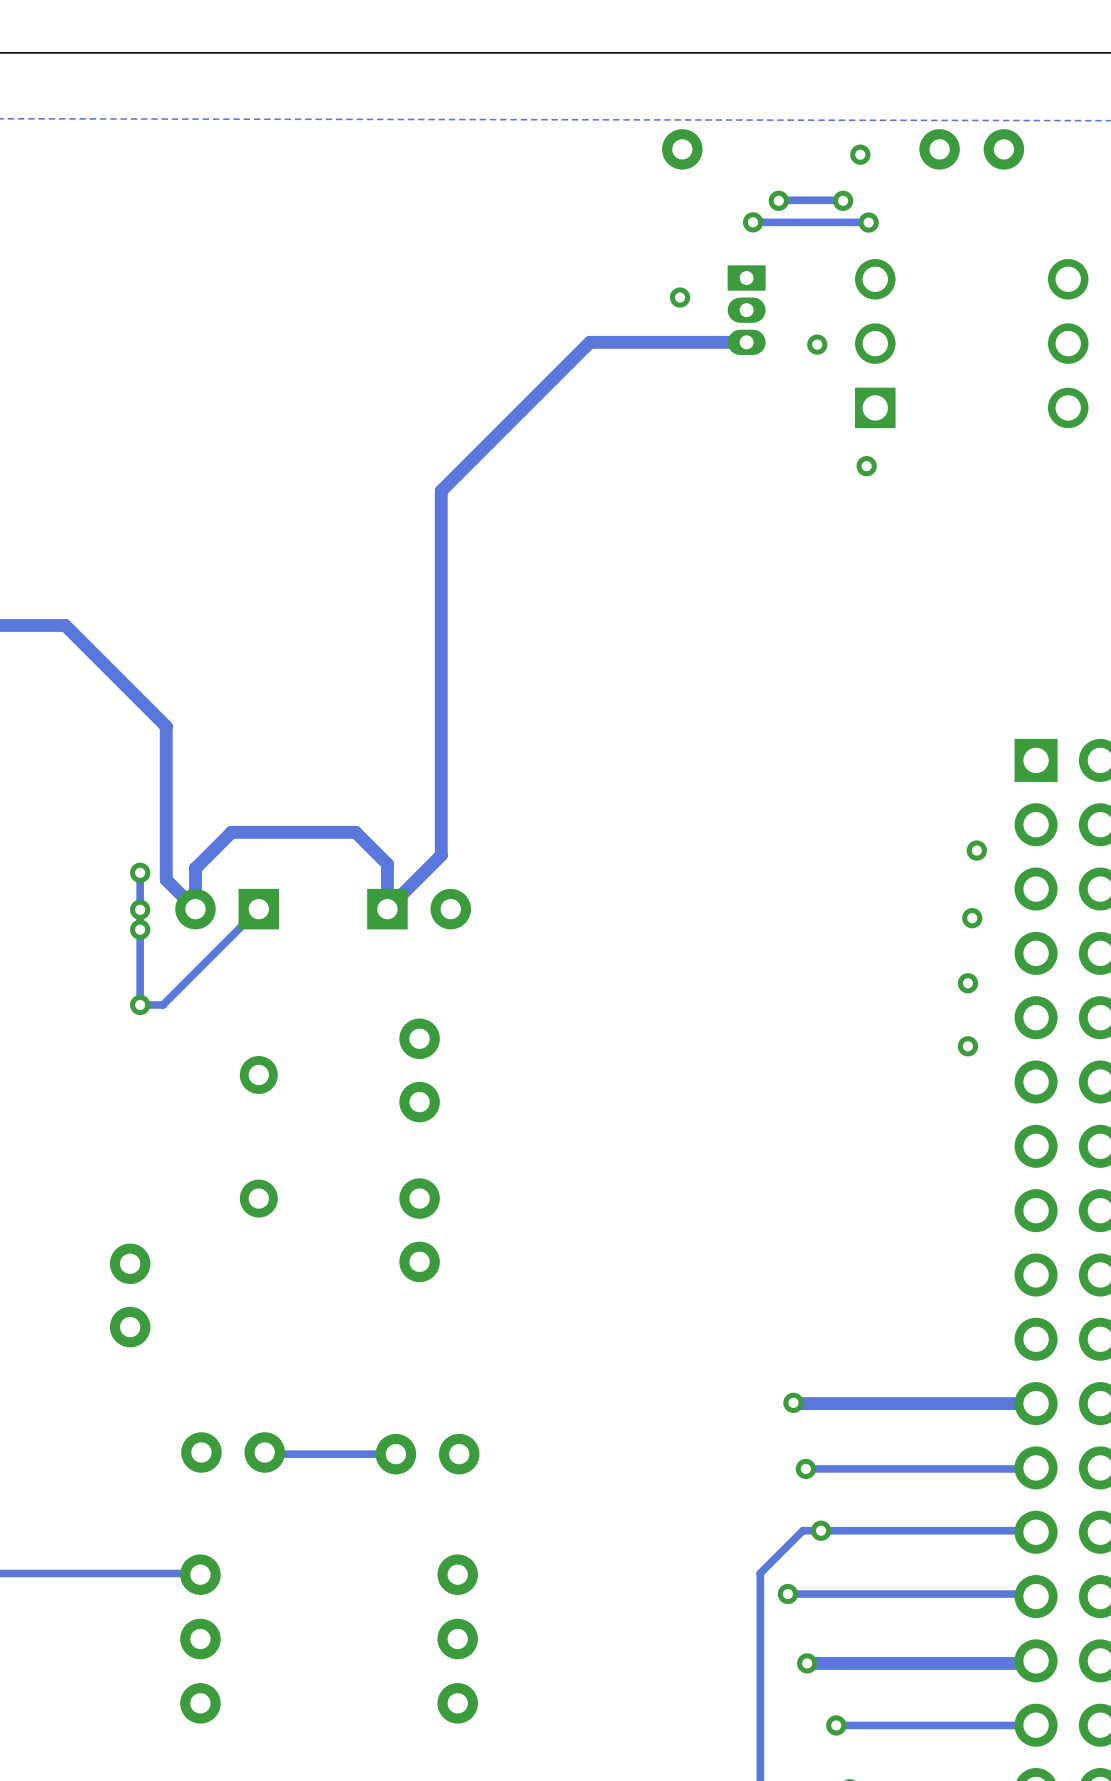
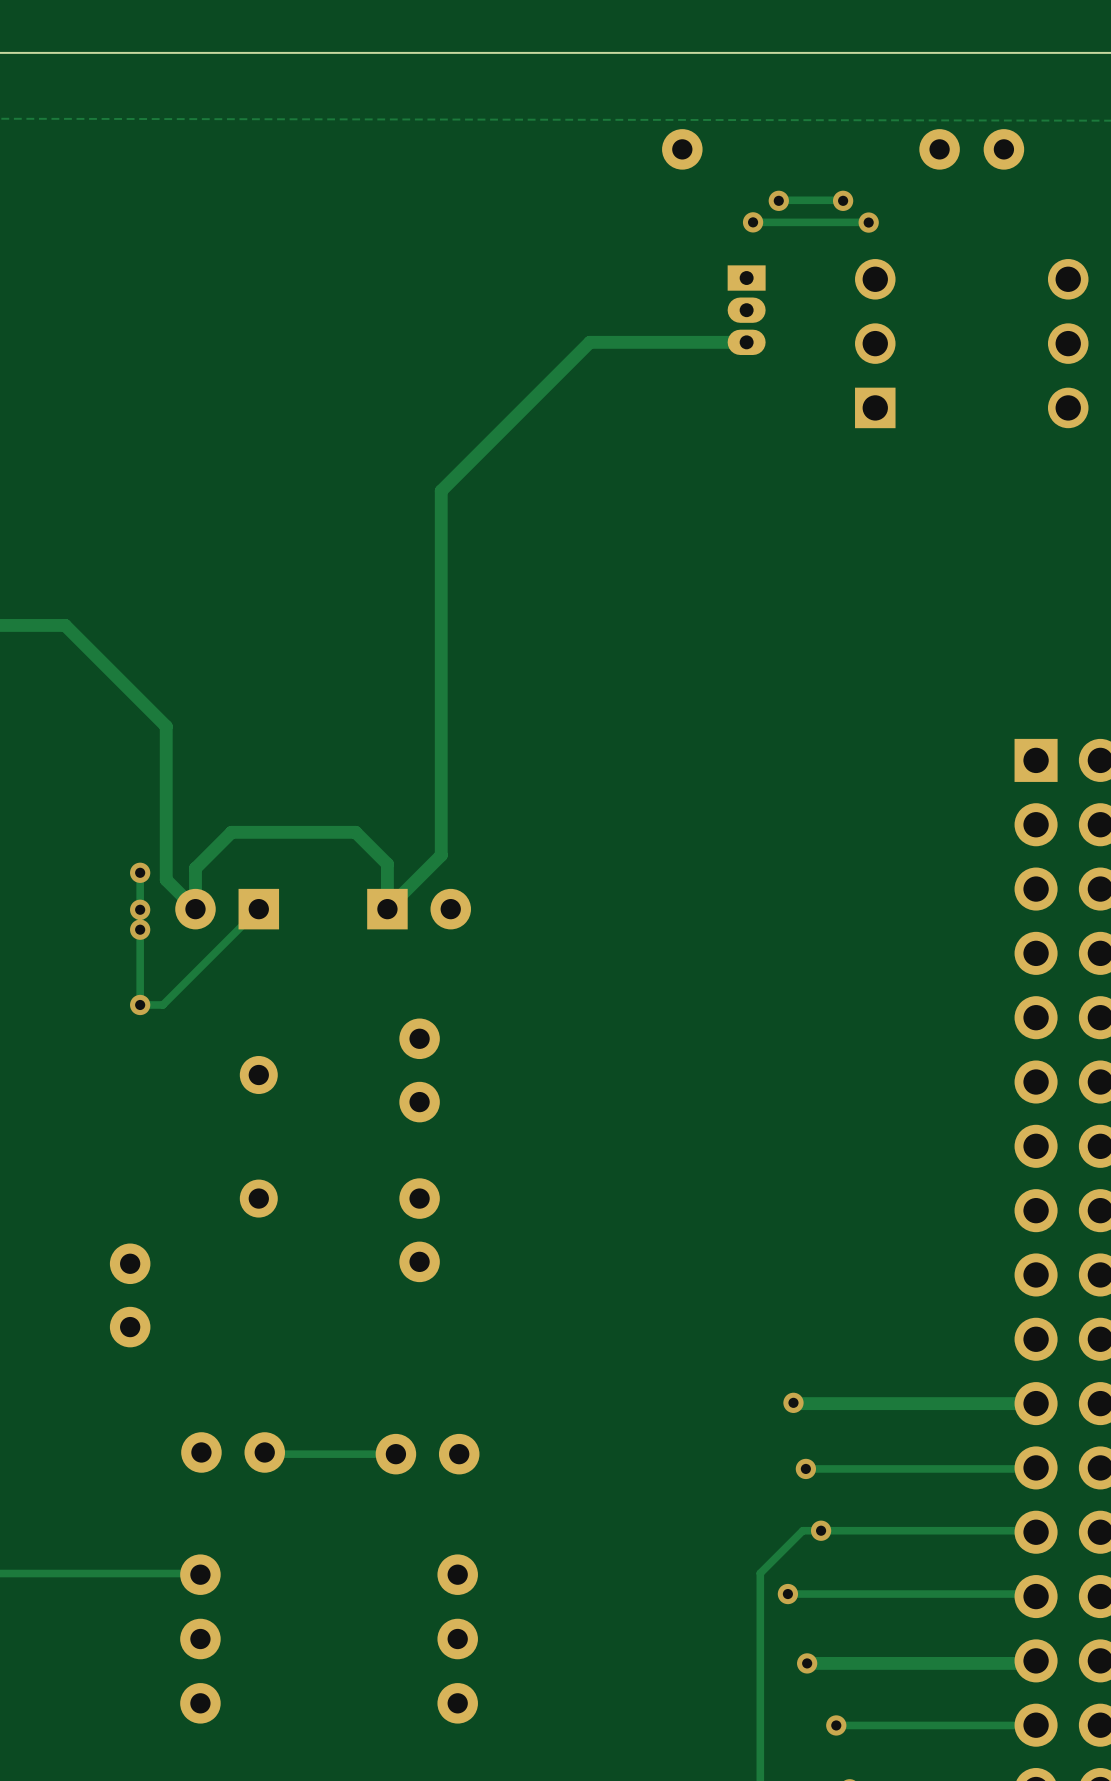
via: (860, 154) -> none
via: (680, 297) -> none
via: (817, 344) -> none
via: (866, 466) -> none
via: (976, 850) -> none
via: (972, 918) -> none
via: (967, 983) -> none
via: (967, 1046) -> none

